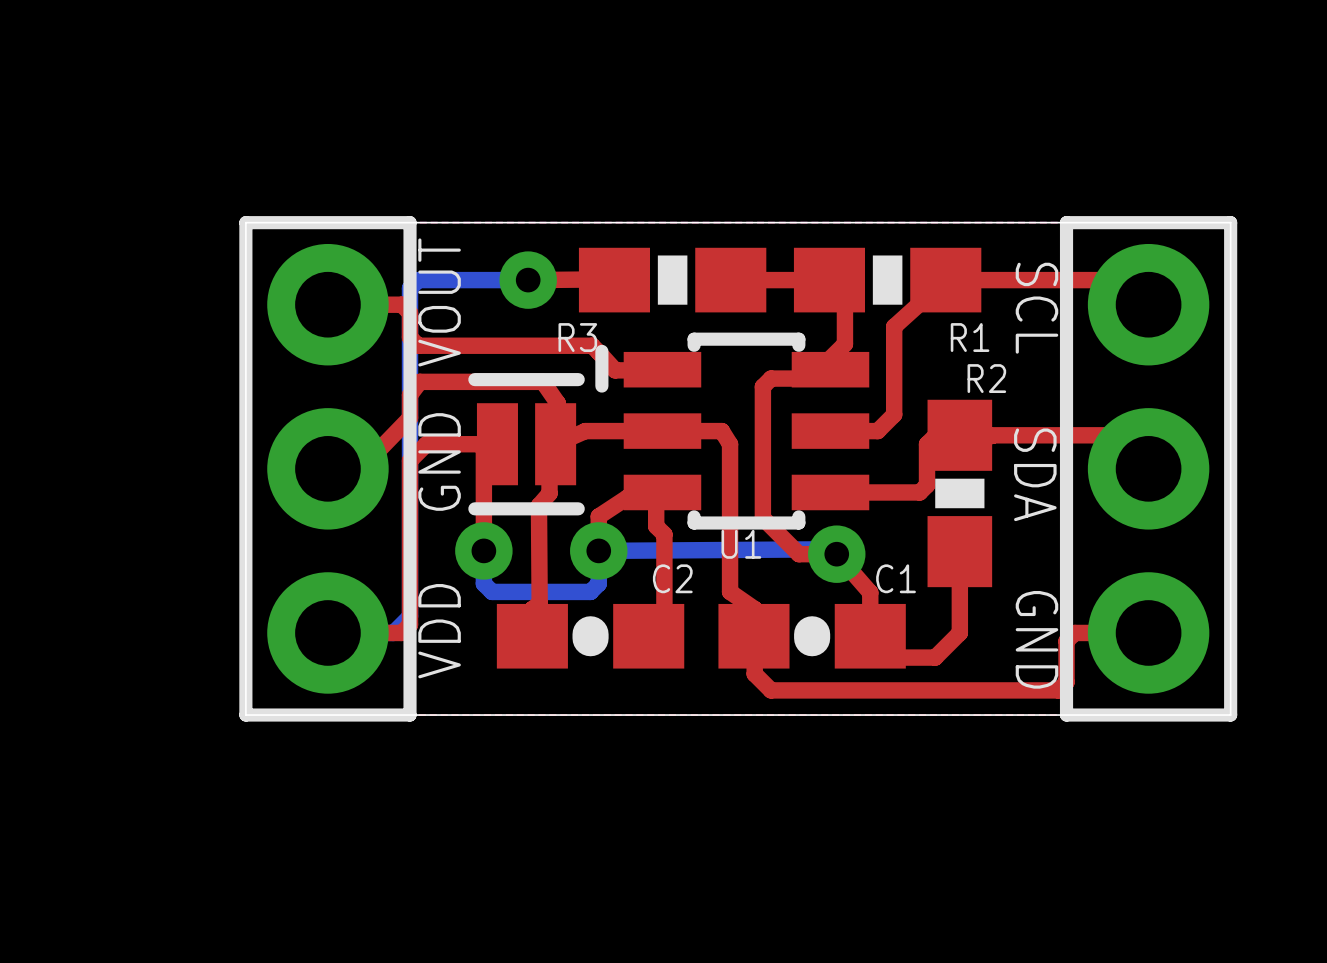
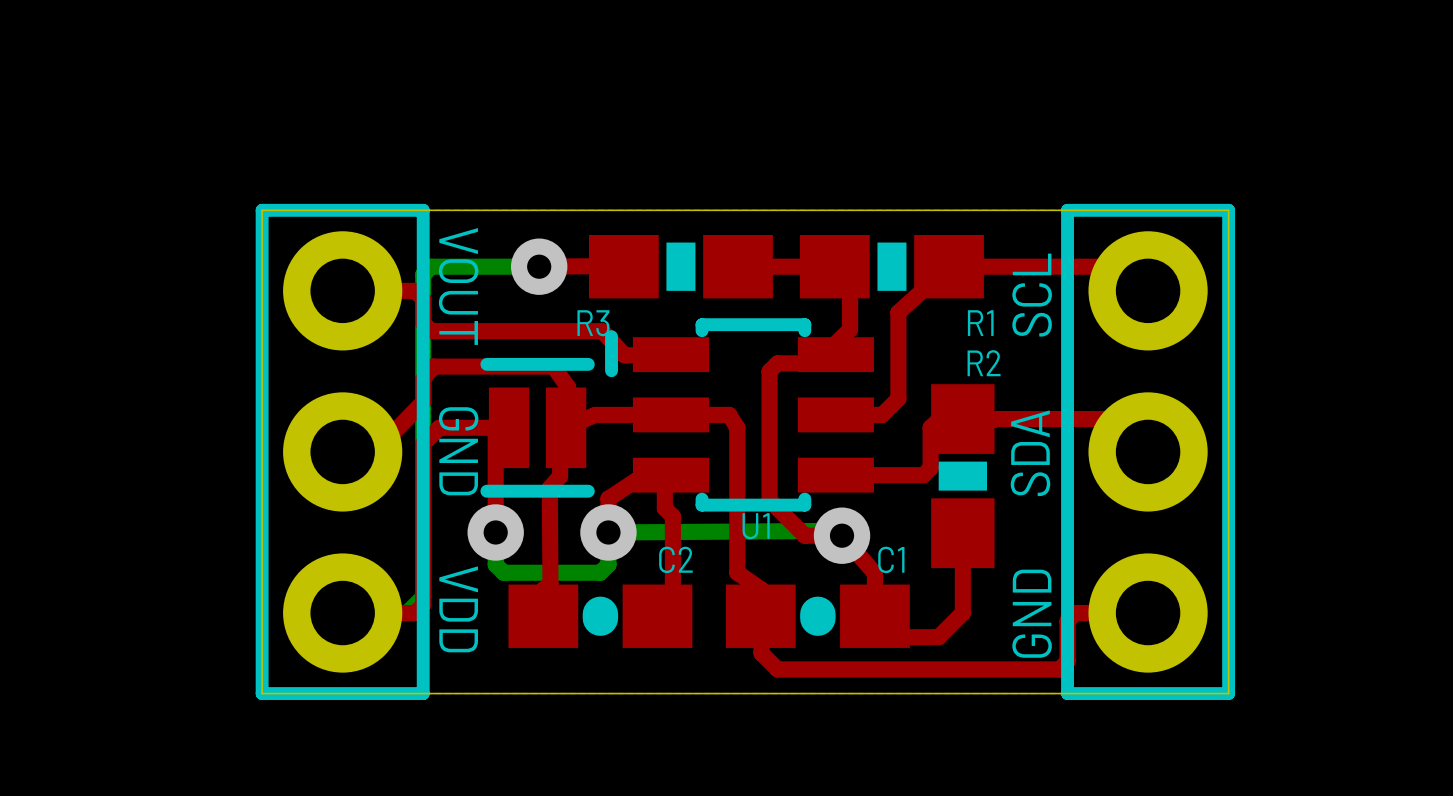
text rotation: 0° (439, 302) -> 180° (458, 286)
text rotation: 0° (1036, 308) -> 180° (1032, 295)
text rotation: 0° (439, 461) -> 180° (458, 451)
text rotation: 0° (1035, 474) -> 180° (1030, 453)
text rotation: 0° (439, 631) -> 180° (458, 609)
text rotation: 0° (1036, 639) -> 180° (1032, 613)

